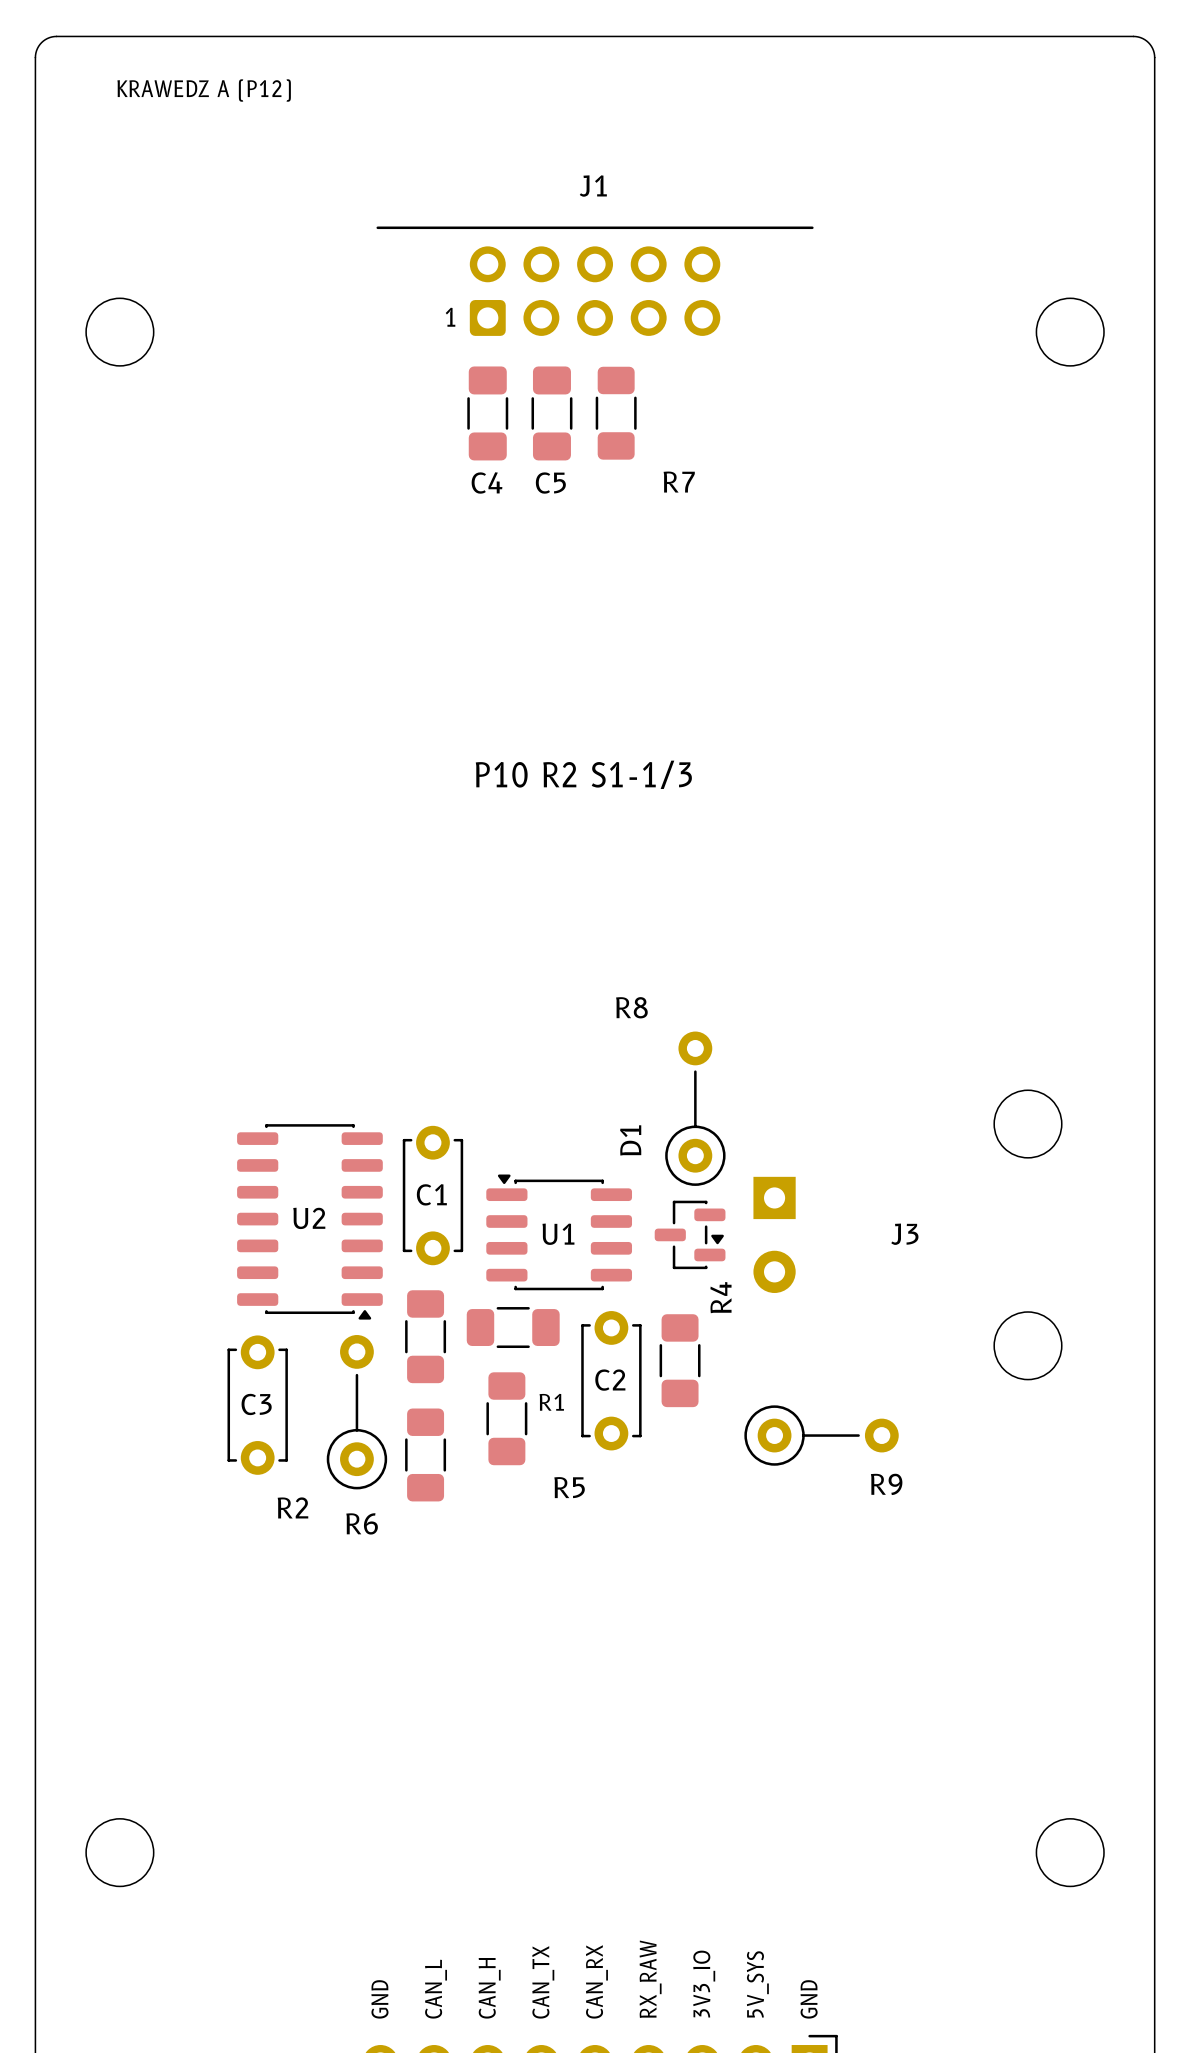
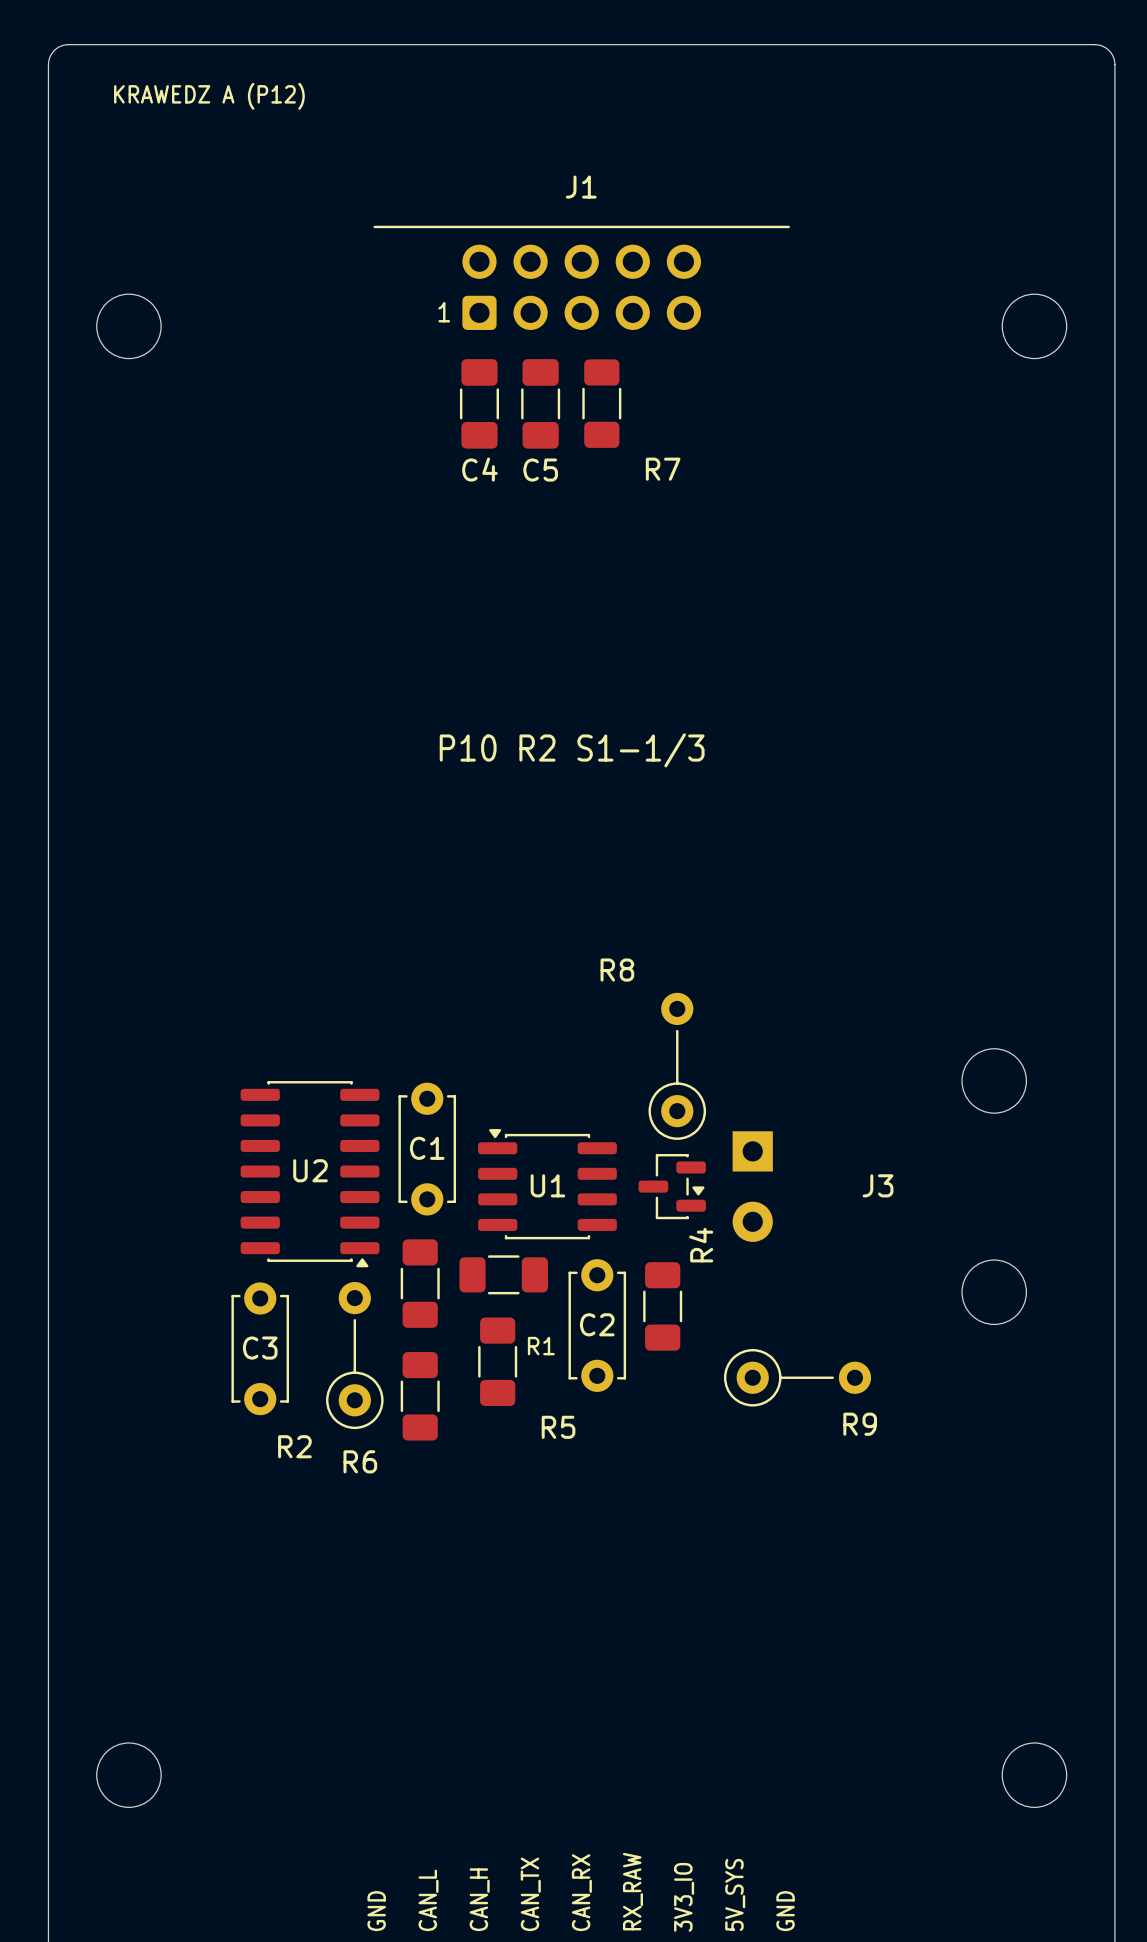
D1 name: D1 (630, 1140) -> none

